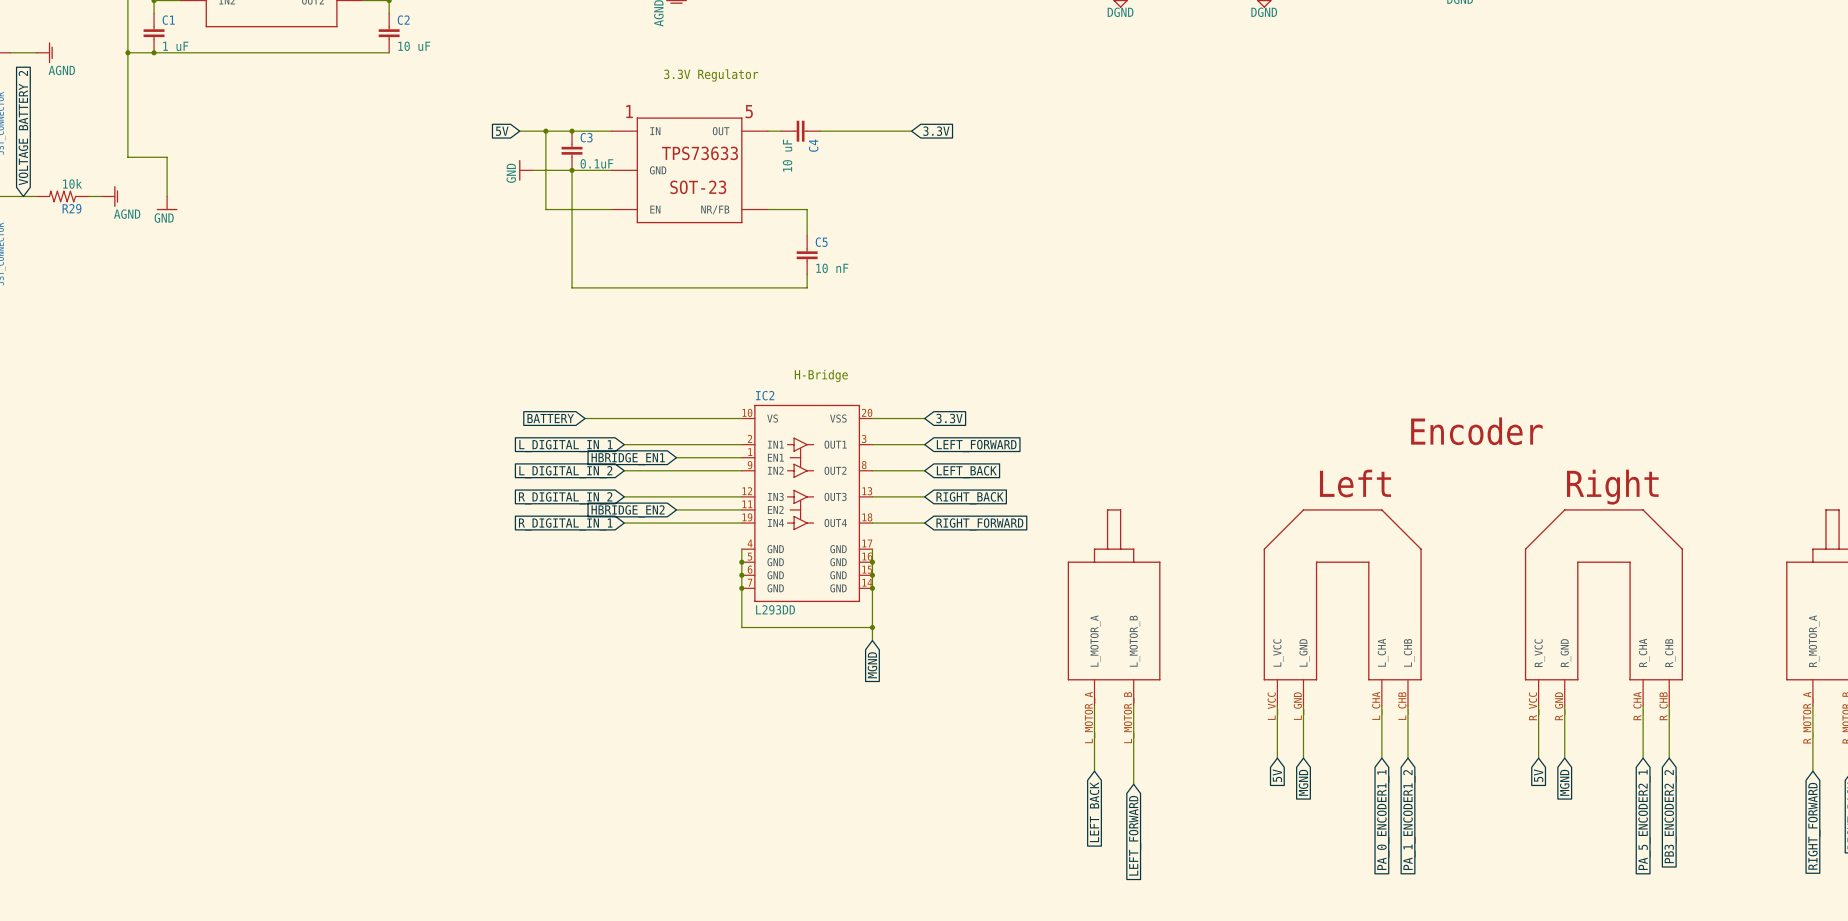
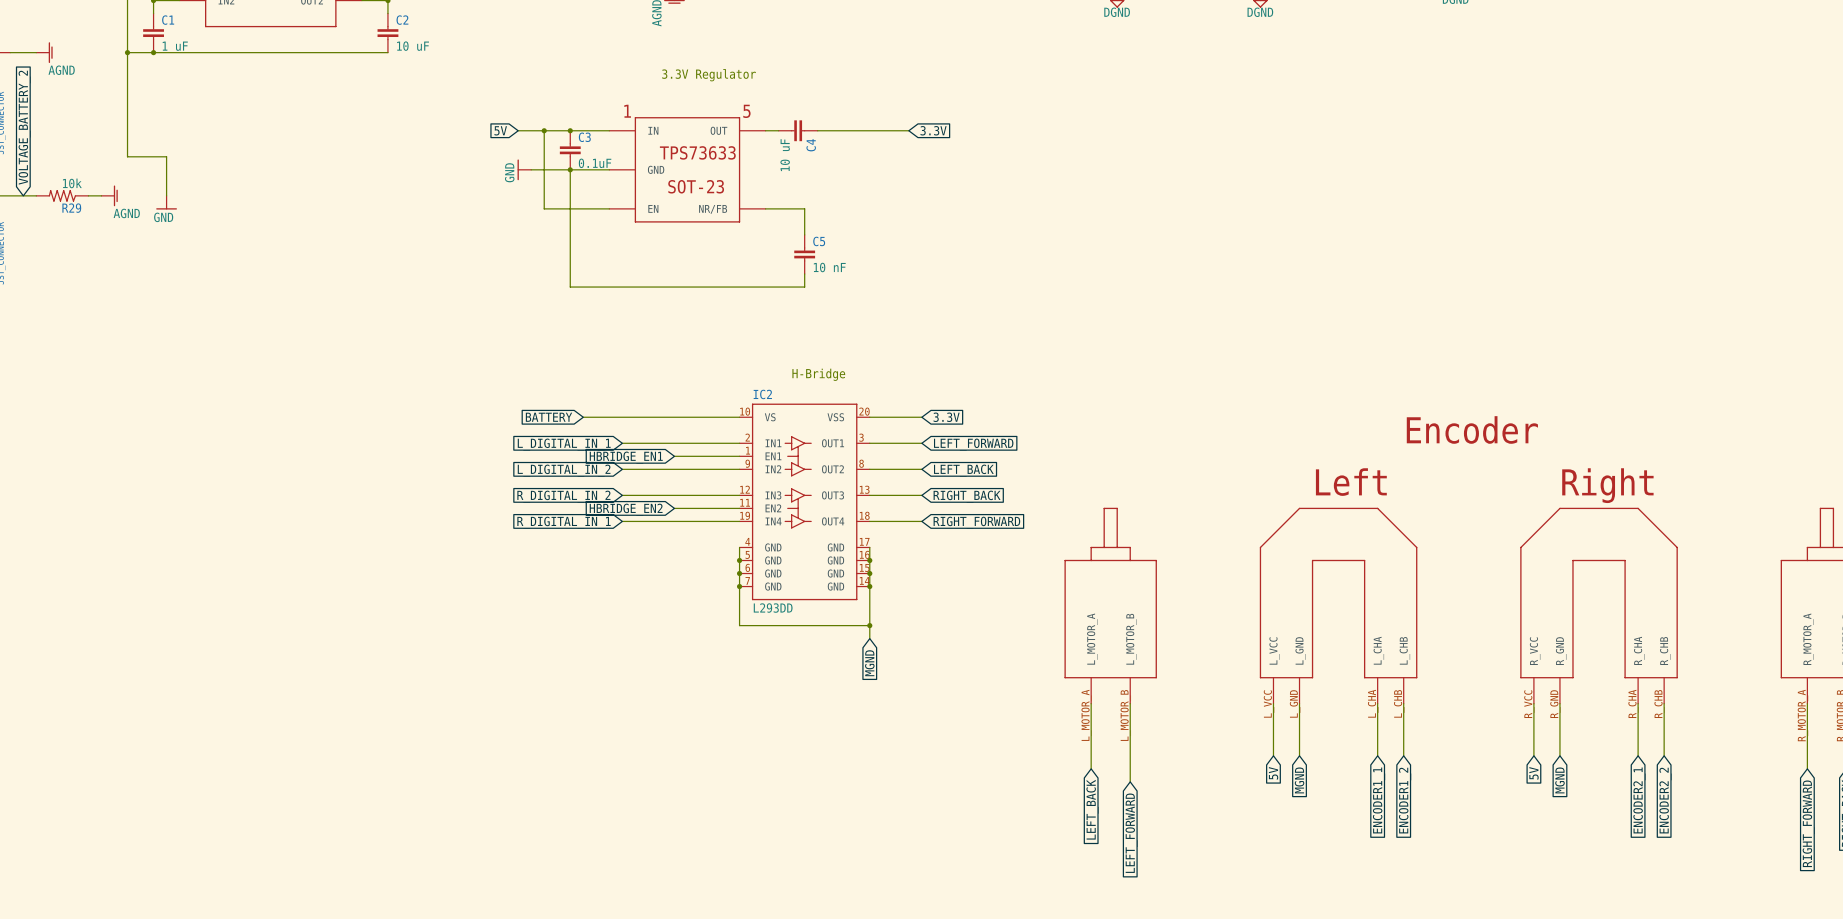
global label: PB3_ENCODER2_2 (1670, 816) -> ENCODER2_2 (1665, 800)
global label: PA_0_ENCODER1_1 (1383, 819) -> ENCODER1_1 (1379, 800)
global label: PA_5_ENCODER2_1 (1644, 819) -> ENCODER2_1 (1639, 800)
global label: PA_1_ENCODER1_2 (1409, 820) -> ENCODER1_2 (1405, 800)

